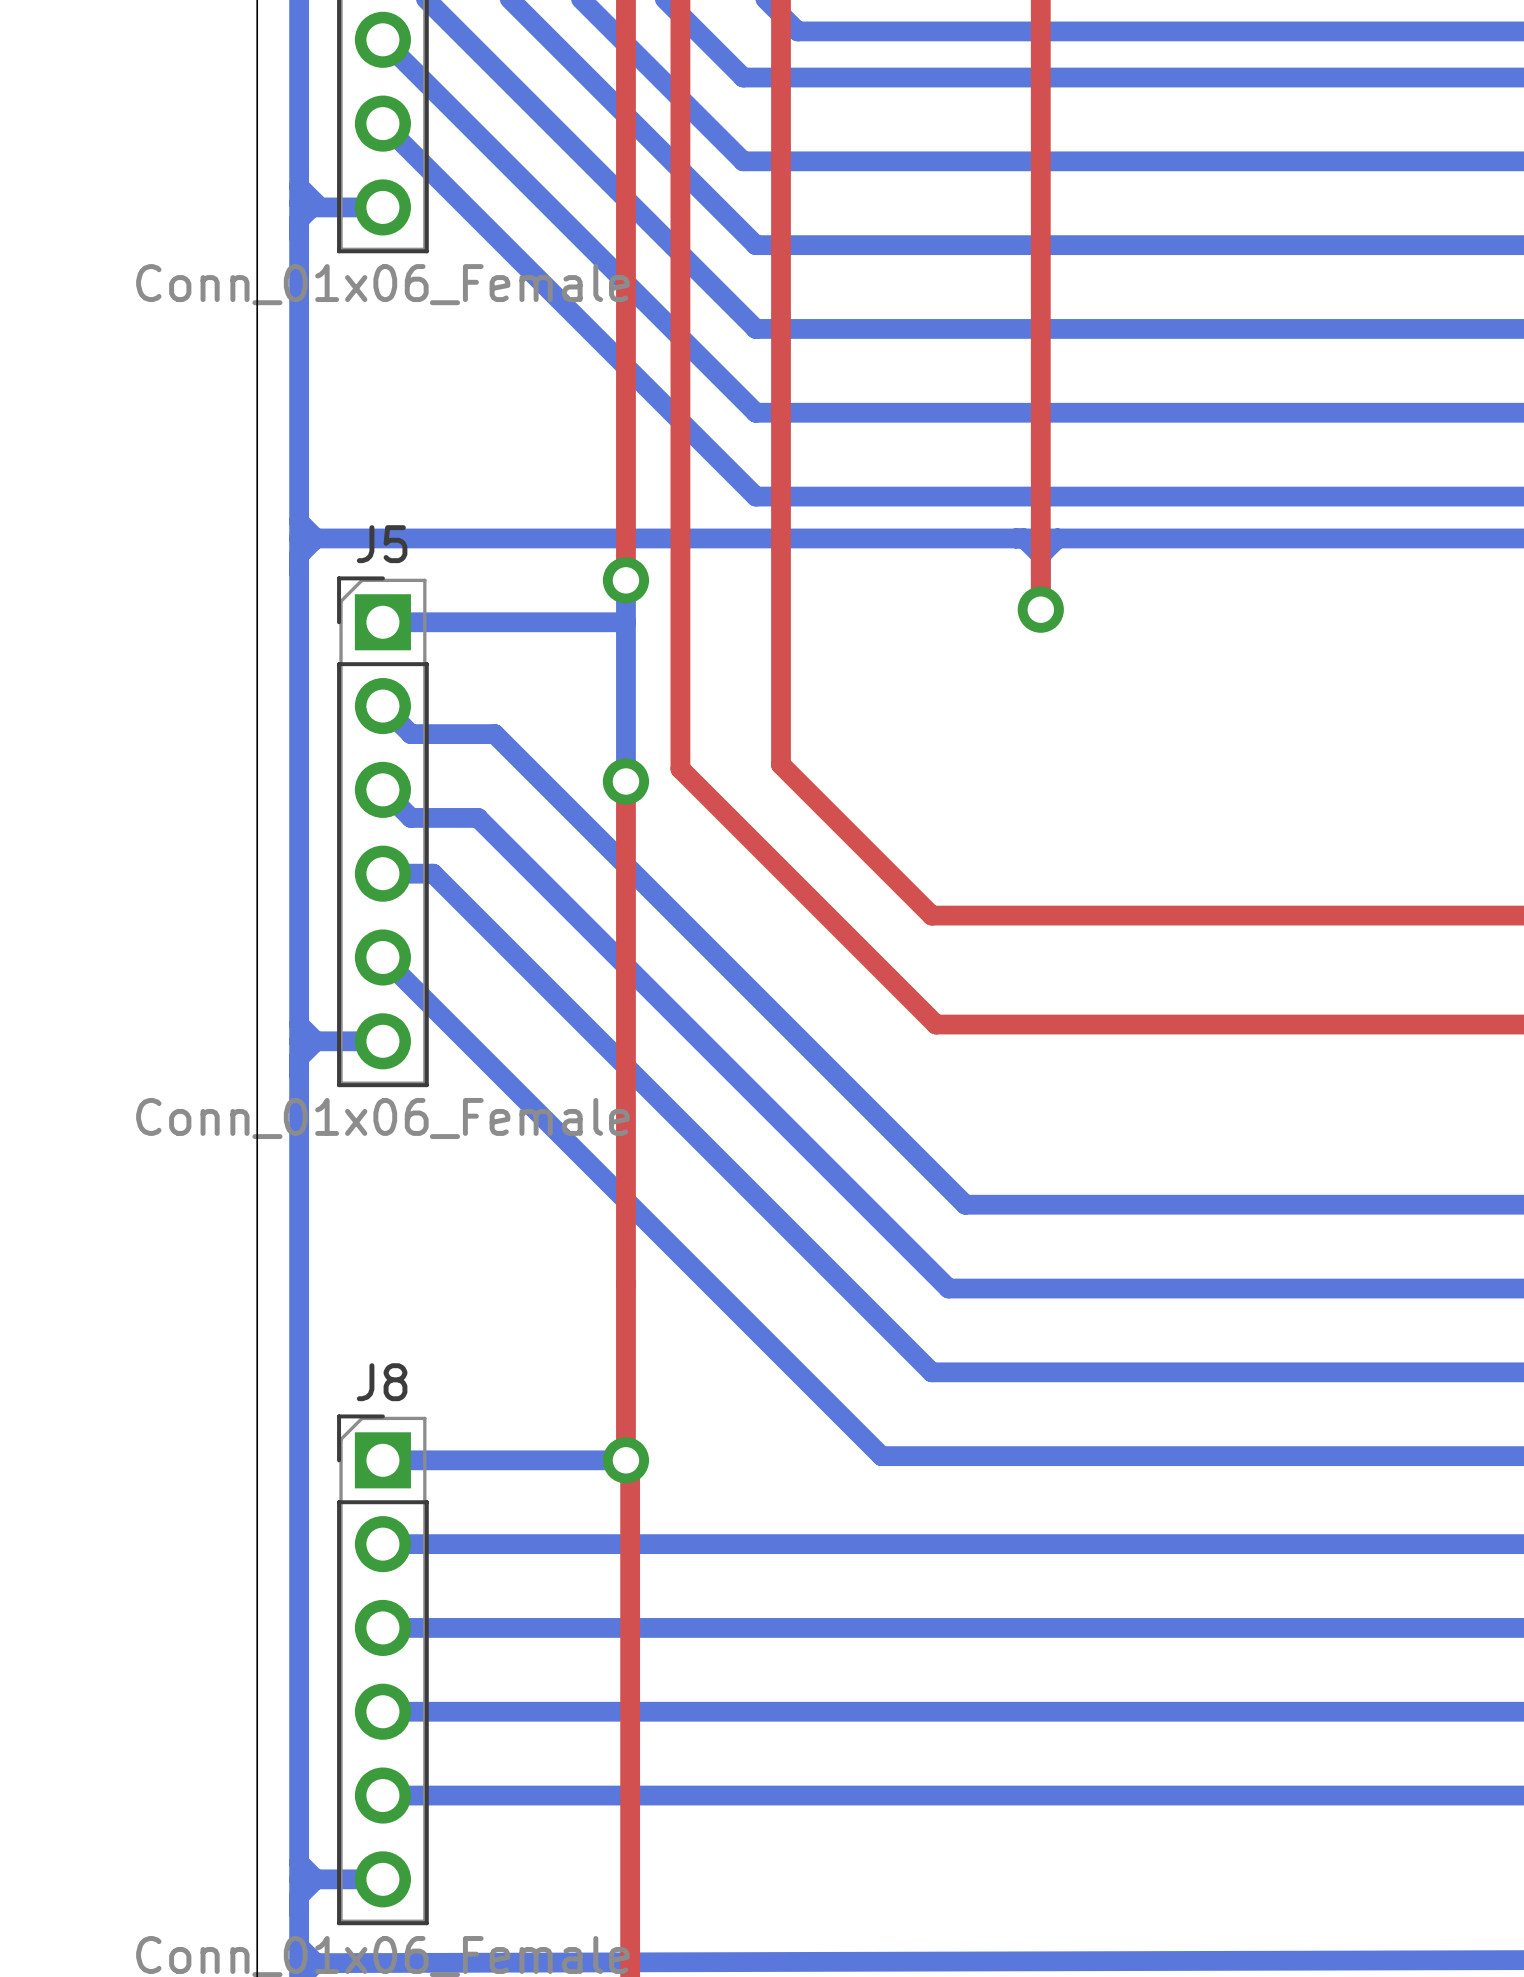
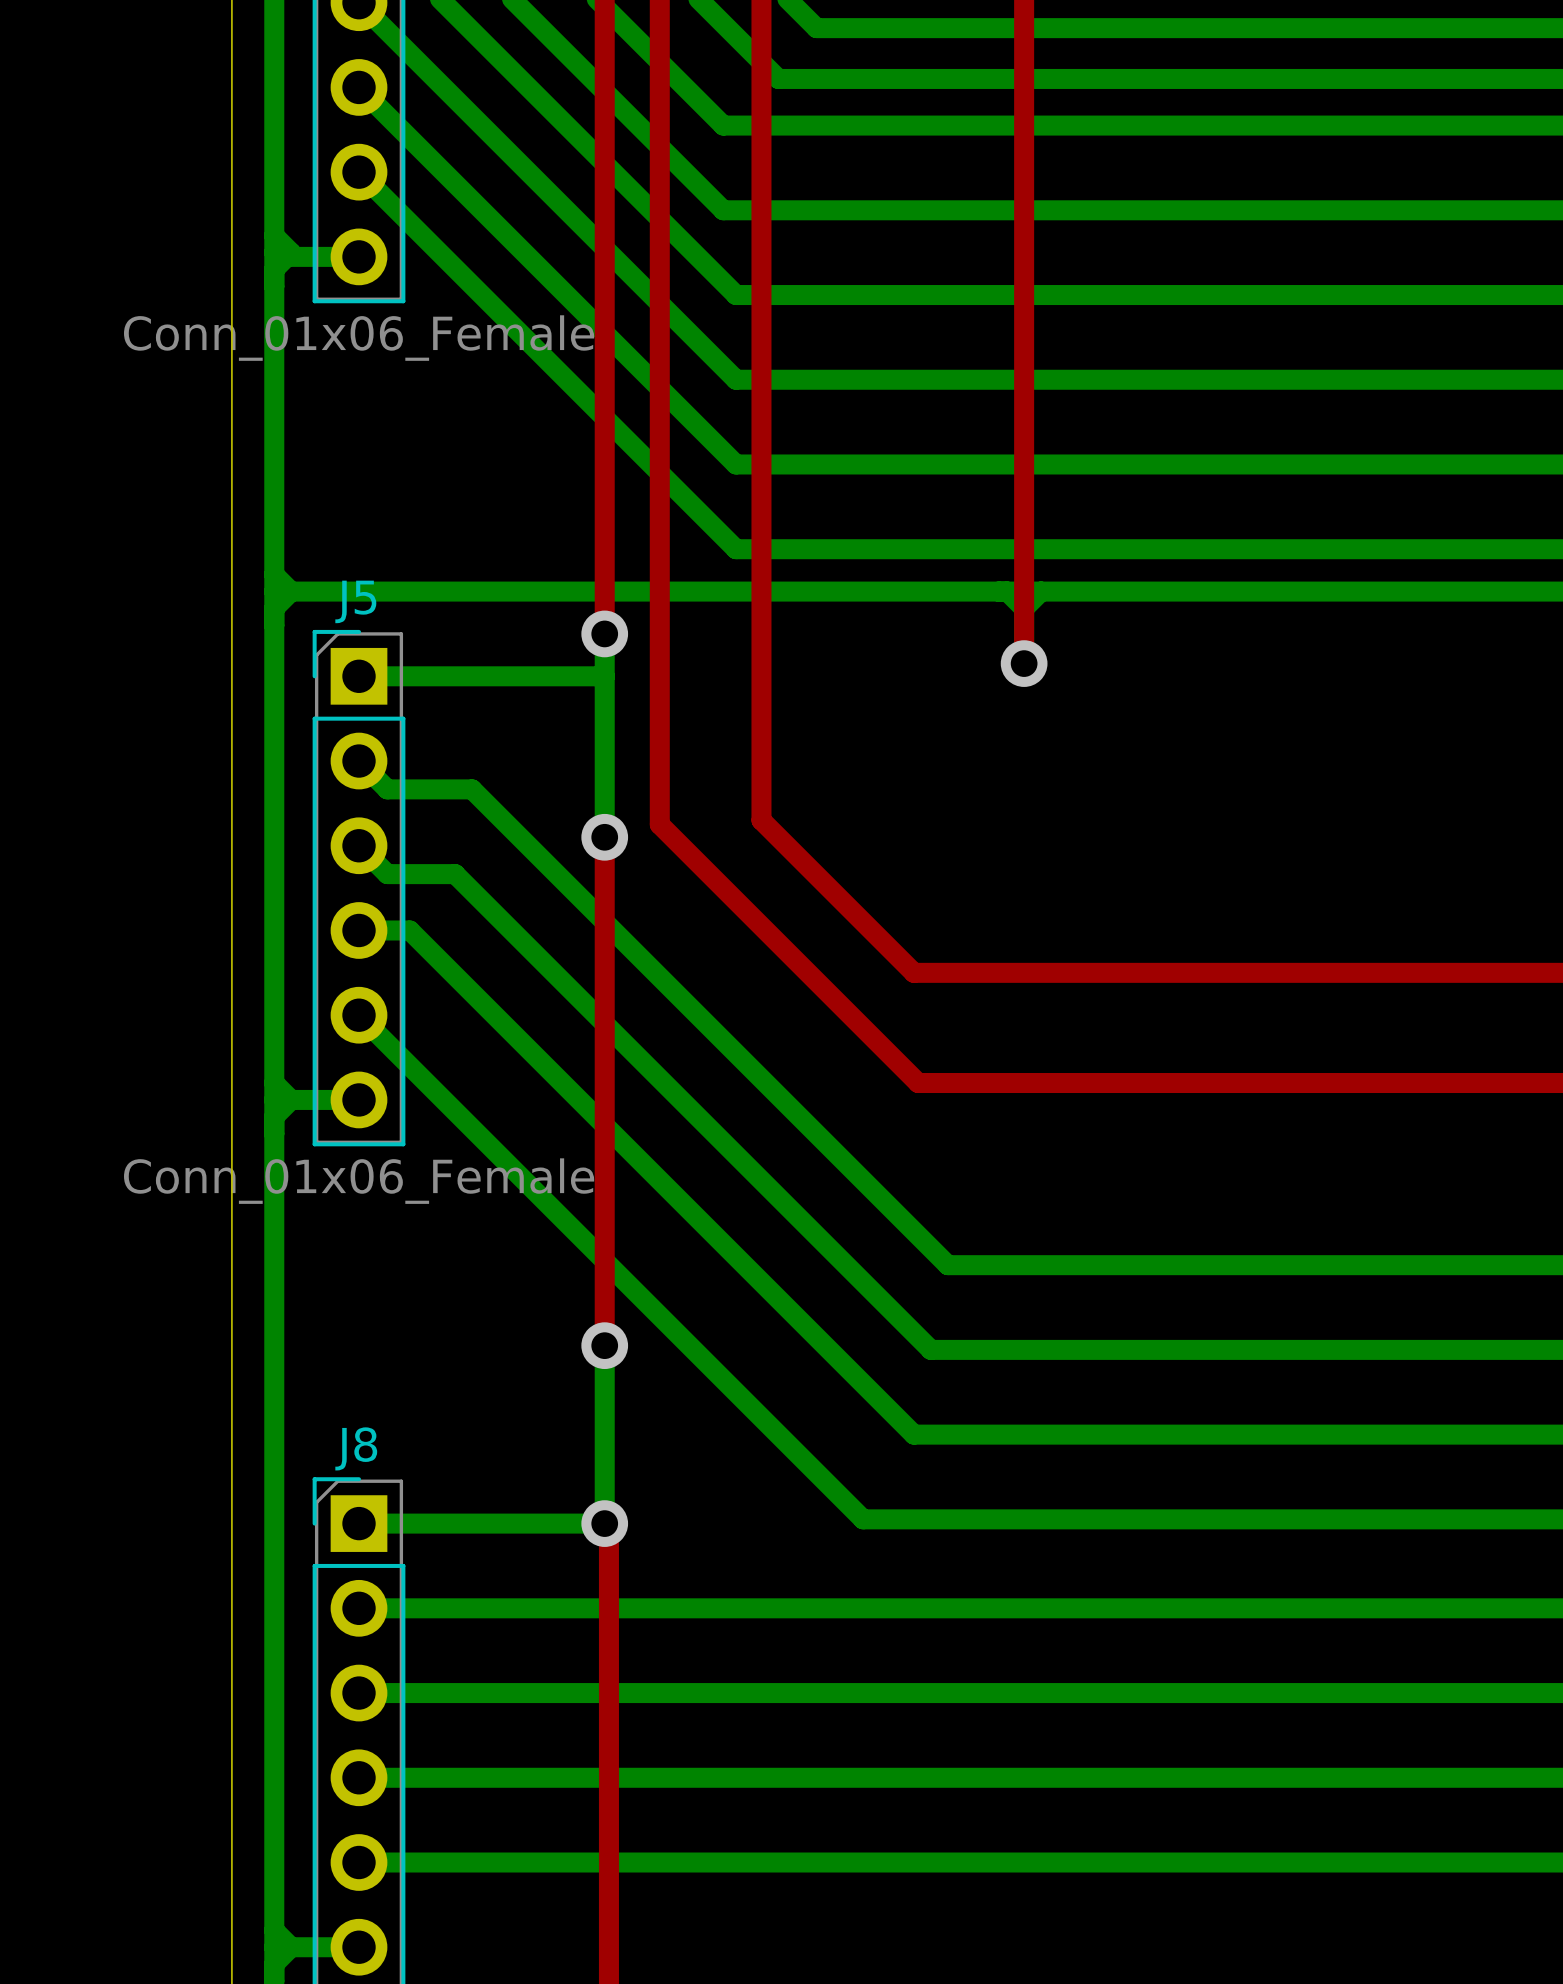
bottom track: none -> (604, 1345) (604, 1523)
top track: (625, 1284) (625, 1460) -> none
via: none -> (604, 1345)

